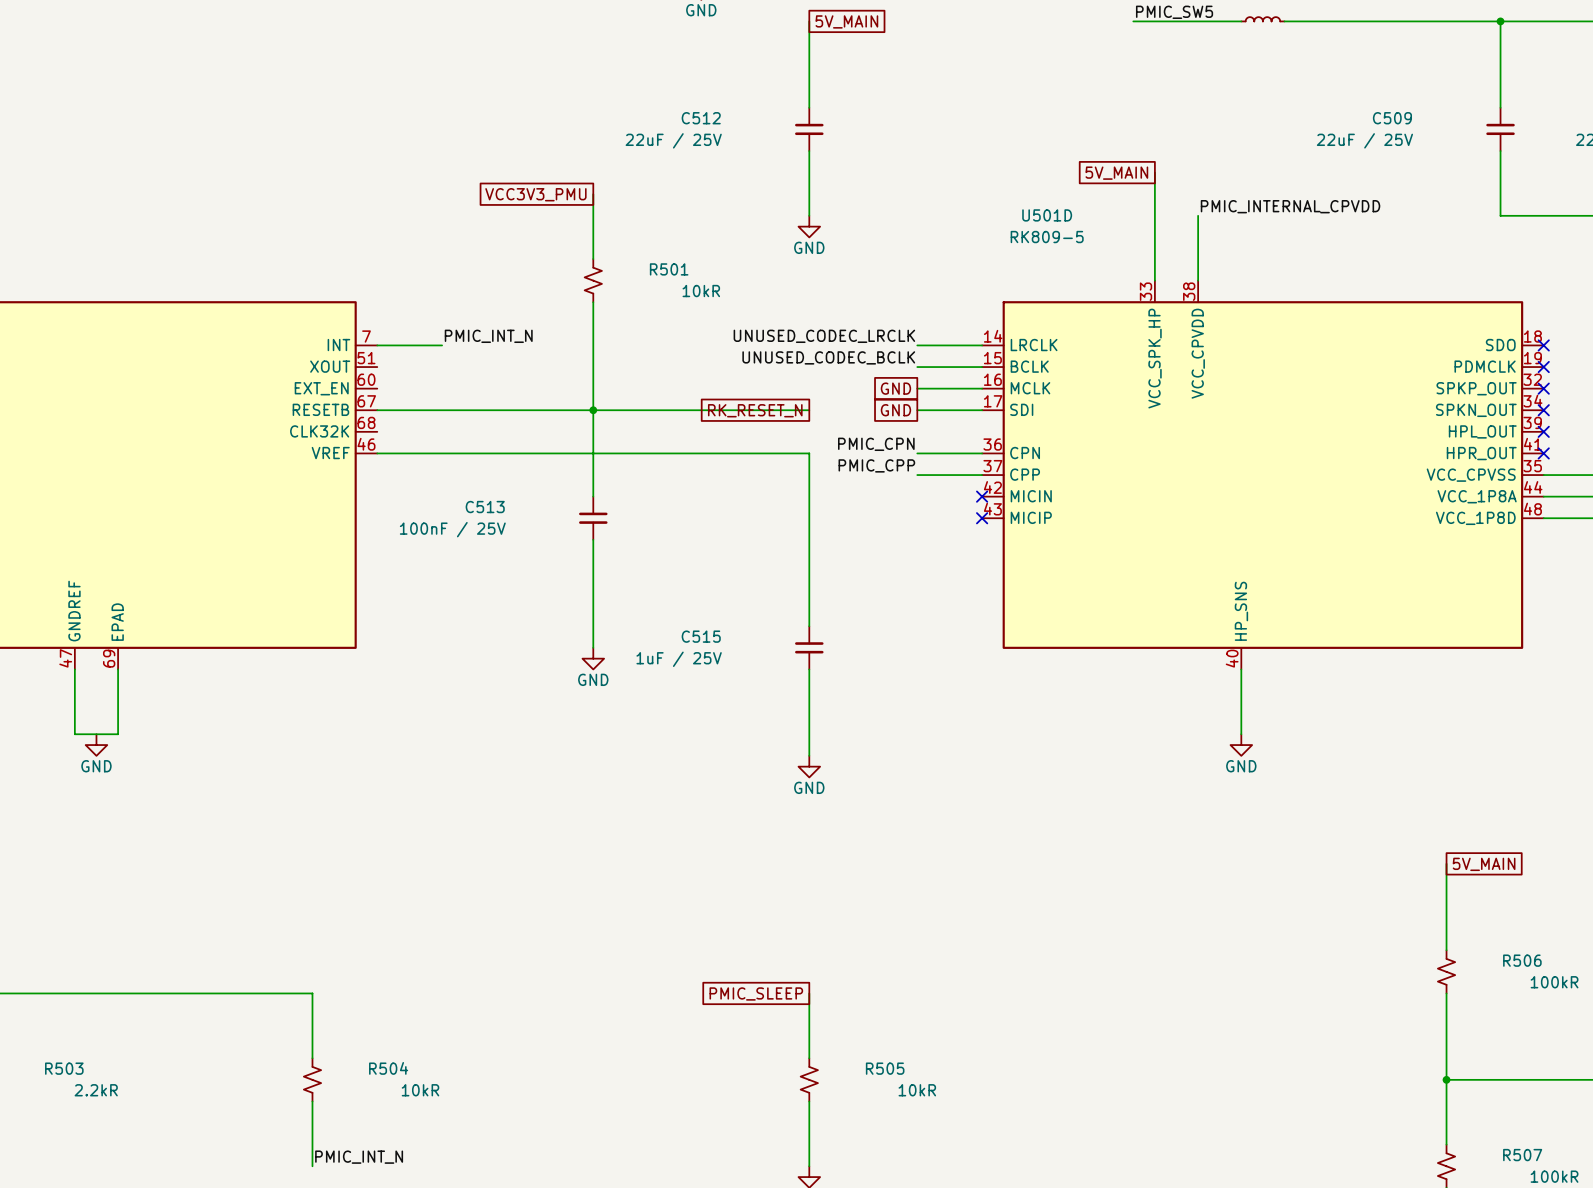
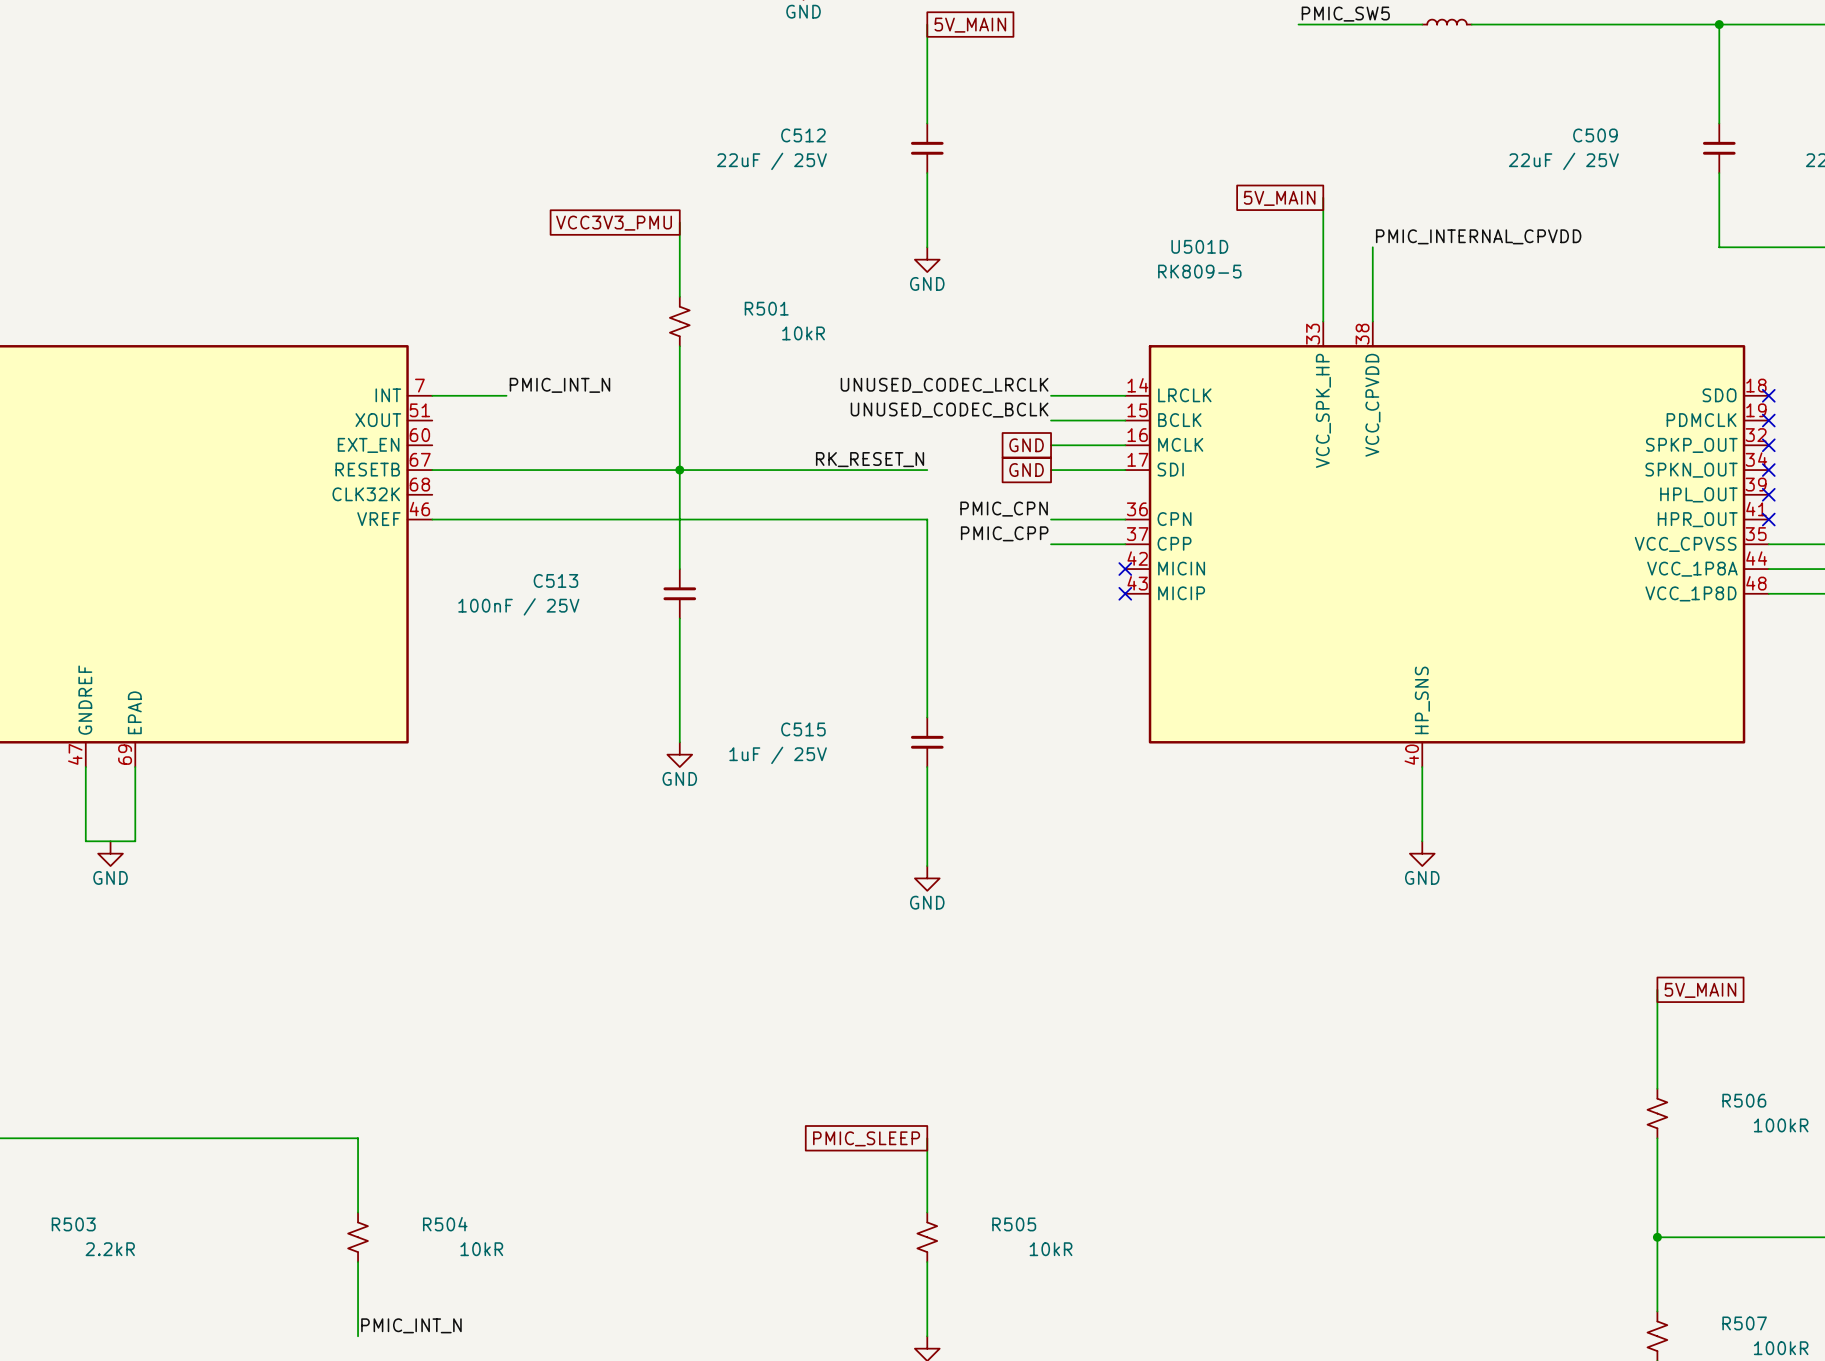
label: none -> RK_RESET_N (870, 459)
global label: RK_RESET_N (755, 410) -> none

